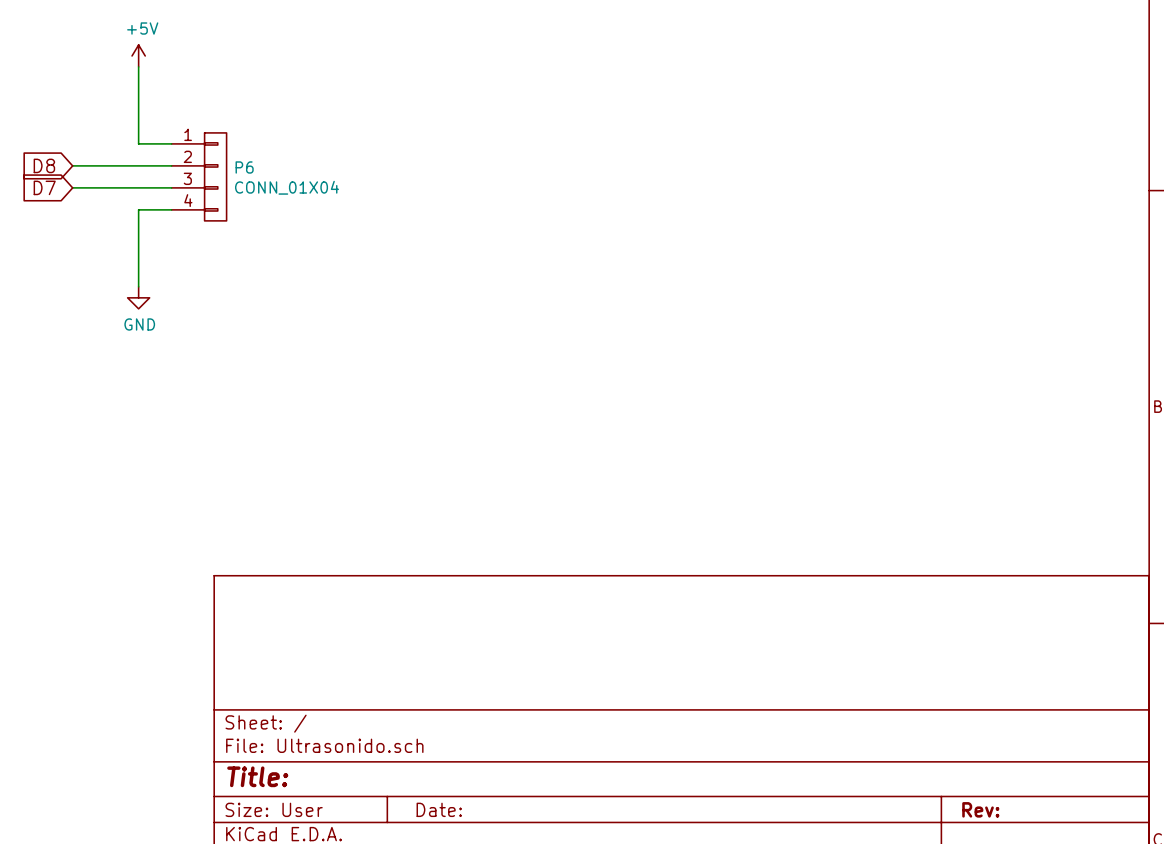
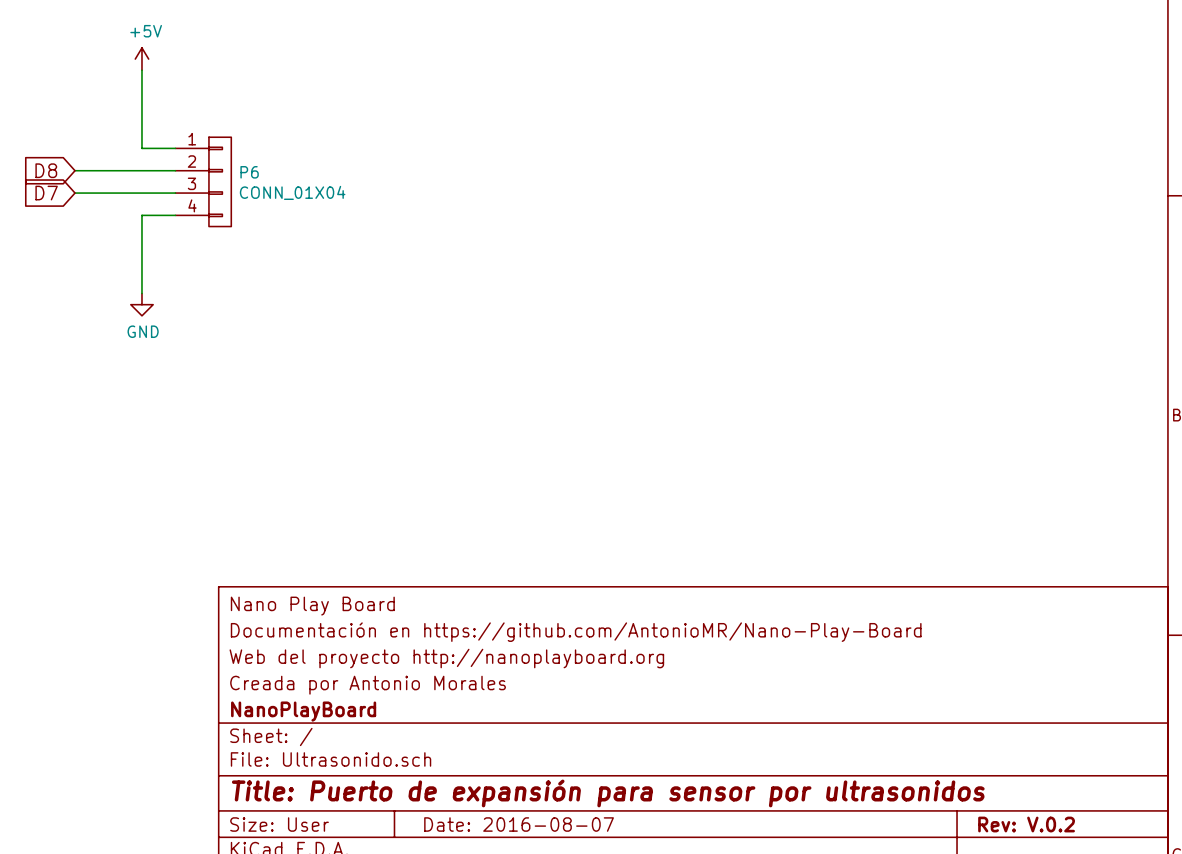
title block: none -> Nano Play Board (312, 606)
title block: none -> Documentación en https://github.com/AntonioMR/Nano-Play-Board (576, 632)
title block: none -> Web del proyecto http://nanoplayboard.org (446, 658)
title block: none -> Creada por Antonio Morales (368, 685)
title block: none -> NanoPlayBoard (303, 711)
title block: Title: (257, 776) -> Title: Puerto de expansión para sensor por ultrasonidos (608, 793)
title block: Date: (439, 809) -> Date: 2016-08-07 (519, 824)
title block: Rev: (980, 809) -> Rev: V.0.2 (1026, 824)

